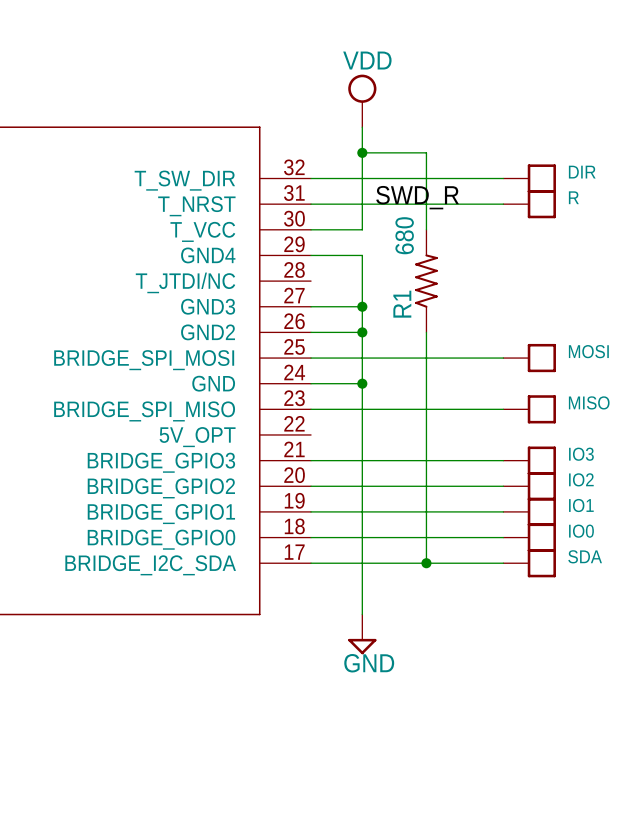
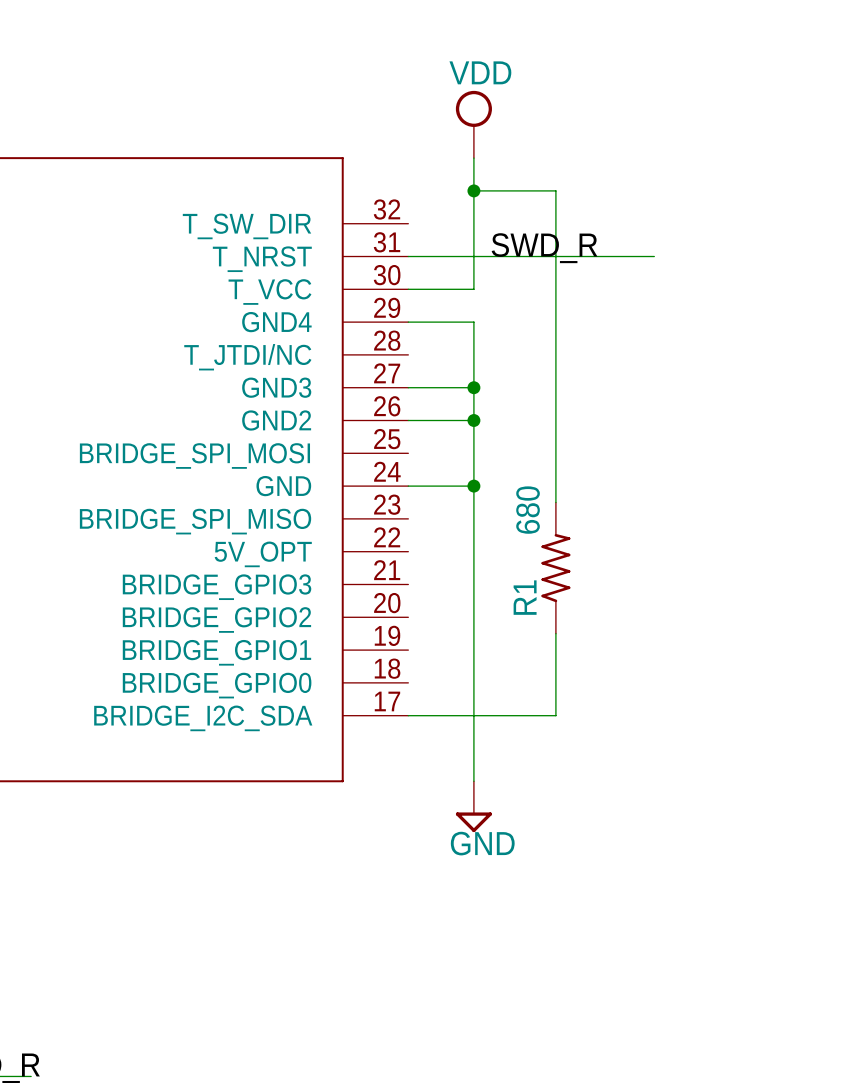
wire: (311, 178) (503, 178) -> none
DIR: (529, 178) -> none
R: (529, 204) -> none
R1 position: (426, 281) -> (555, 568)
wire: (311, 358) (503, 358) -> none
MOSI: (529, 358) -> none
wire: (311, 409) (503, 409) -> none
MISO: (529, 409) -> none
wire: (311, 460) (503, 460) -> none
IO3: (529, 460) -> none
wire: (311, 486) (503, 486) -> none
IO2: (529, 486) -> none
wire: (311, 511) (503, 511) -> none
IO1: (529, 511) -> none
wire: (311, 537) (503, 537) -> none
IO0: (529, 537) -> none
wire: (426, 563) (503, 563) -> none
junction: (426, 563) -> none
SDA: (529, 563) -> none

